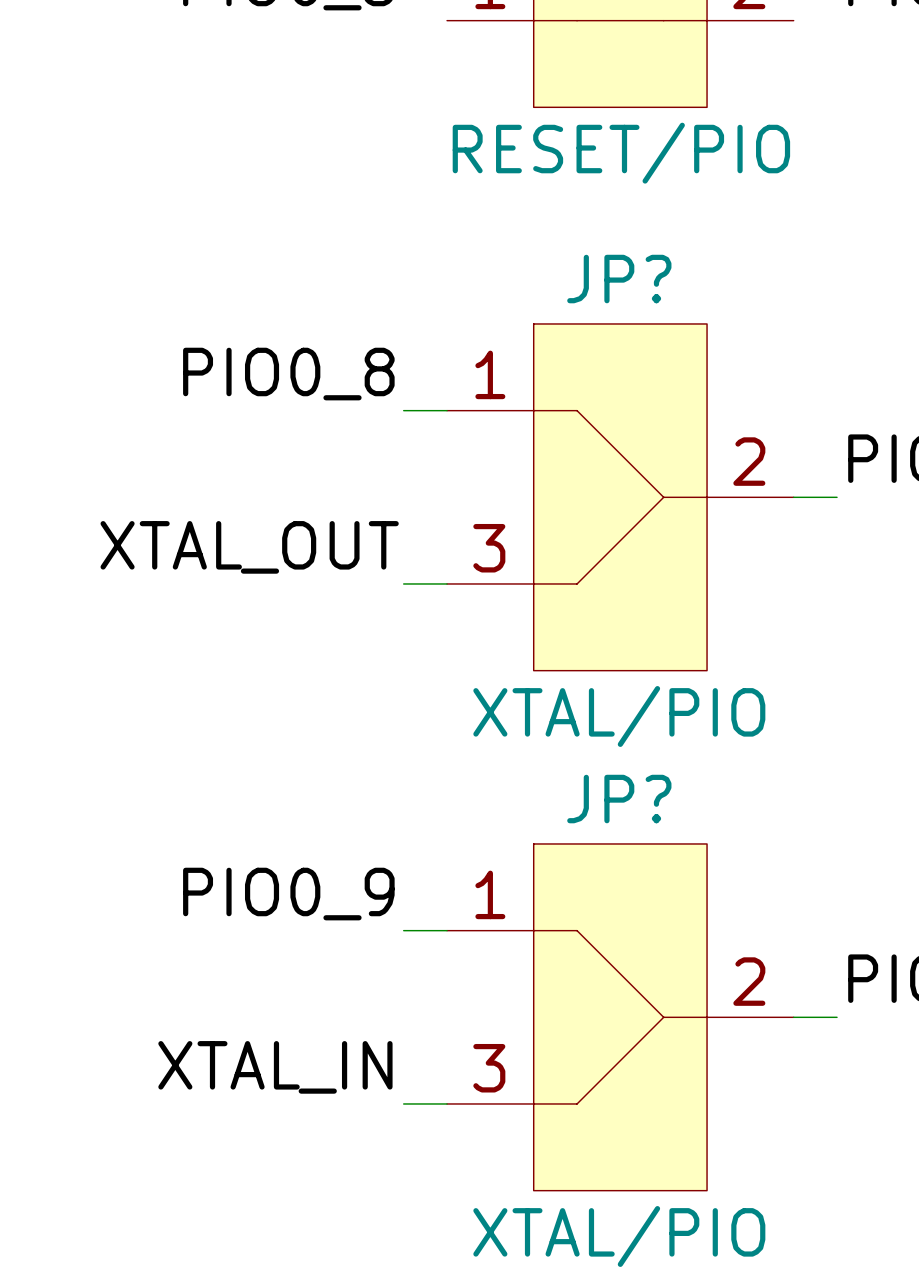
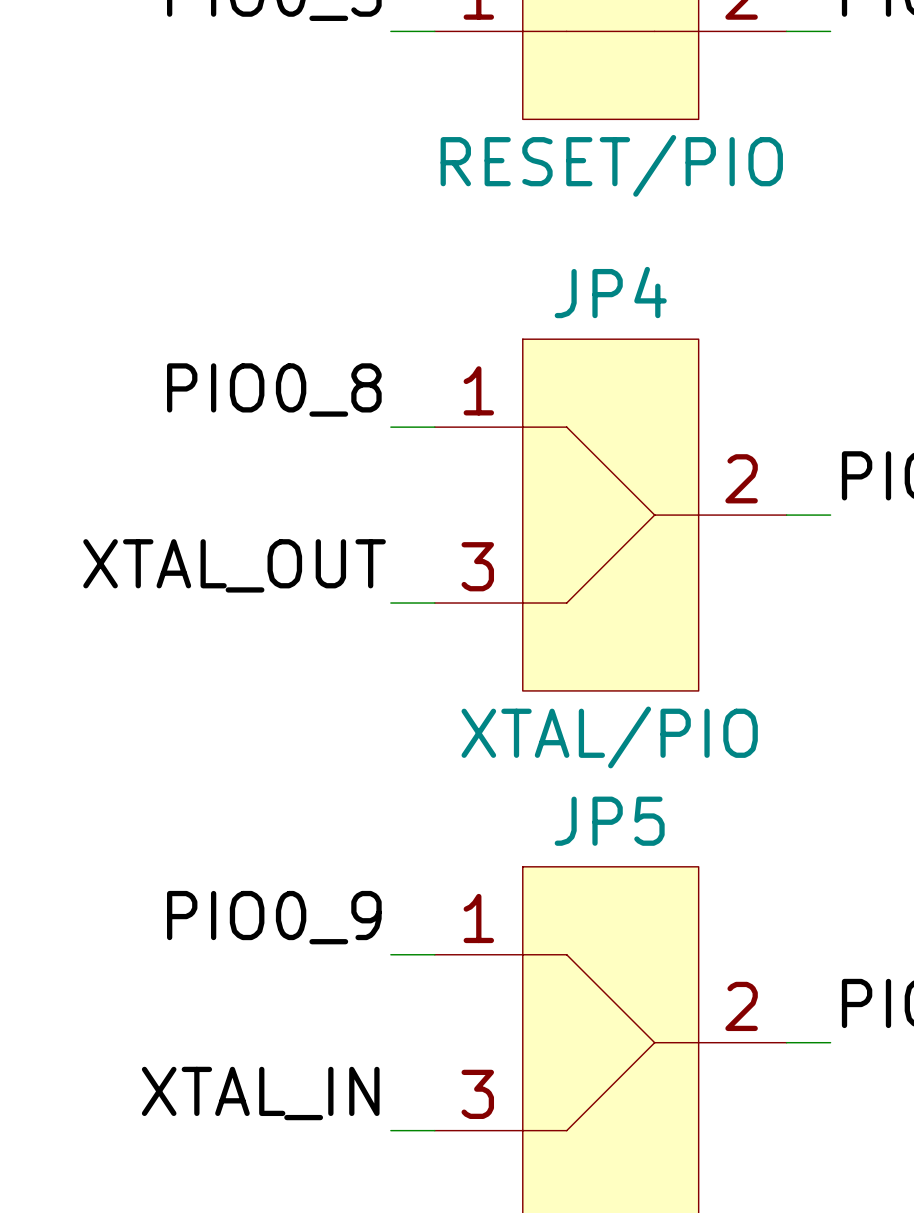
wire: none -> (390, 31) (434, 31)
wire: none -> (786, 31) (830, 31)
JP? name: JP? (619, 279) -> JP4 (610, 292)
JP? name: JP? (619, 799) -> JP5 (609, 821)

